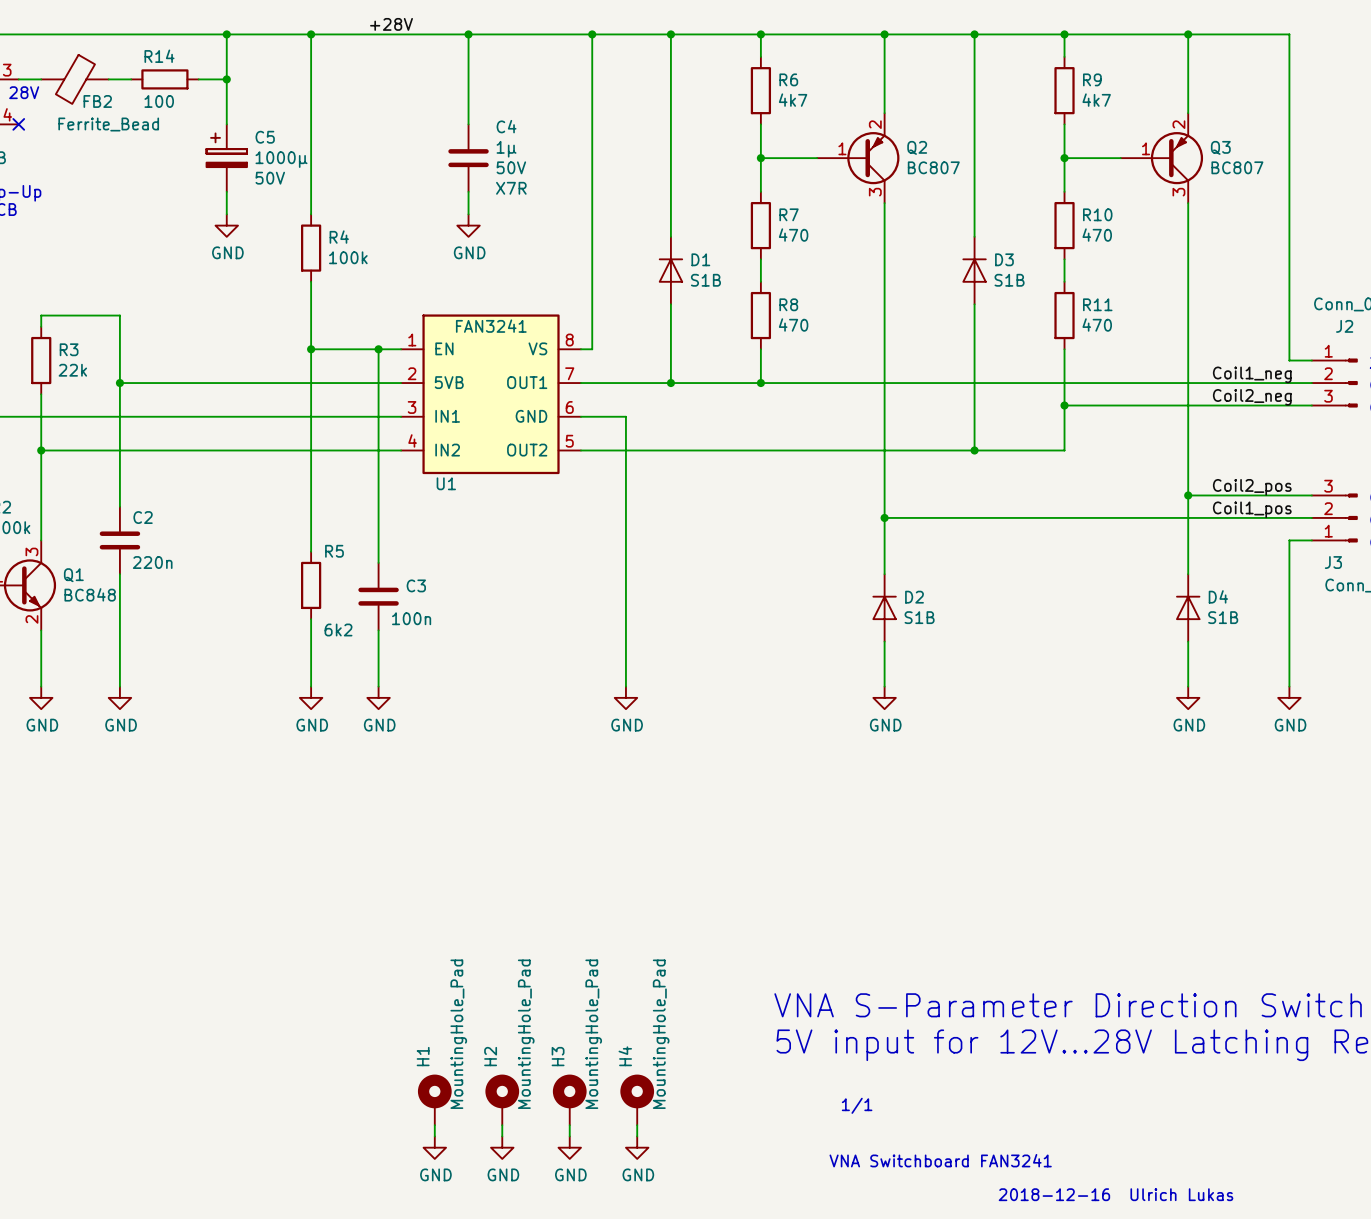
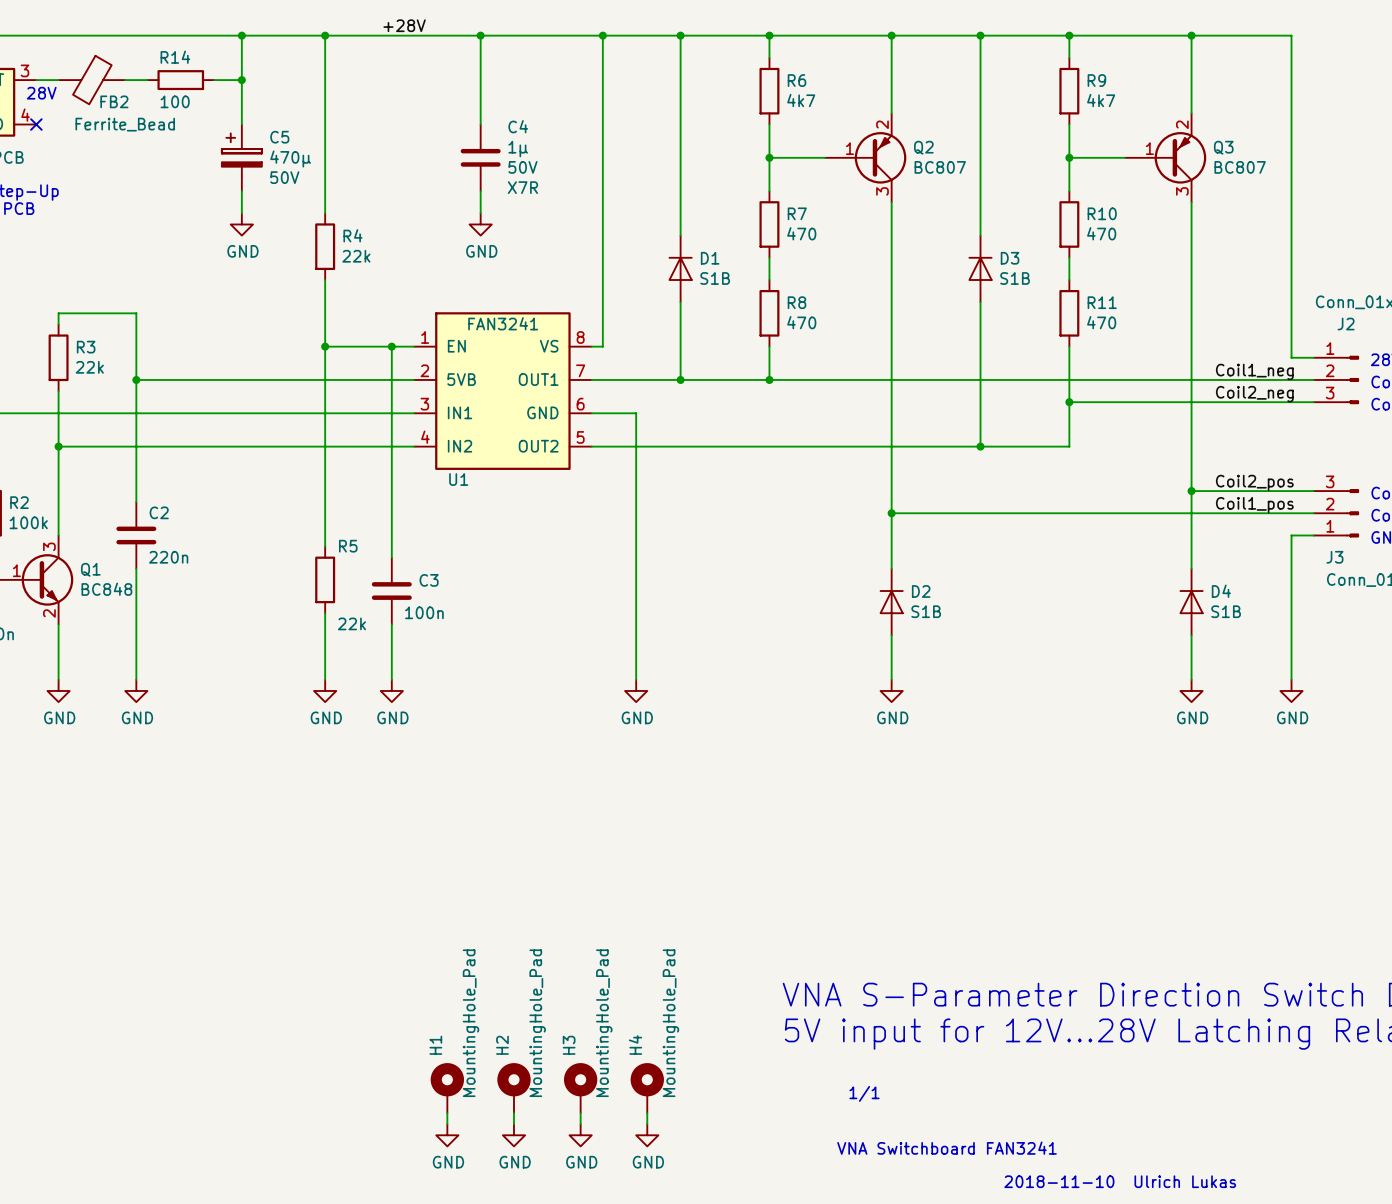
C5 value: 1000µ (281, 159) -> 470µ (290, 159)
R4 value: 100k (348, 257) -> 22k (356, 256)
R5 value: 6k2 (338, 629) -> 22k (351, 623)
text: 2018-12-16 Ulrich Lukas (1116, 1194) -> 2018-11-10 Ulrich Lukas (1120, 1181)

